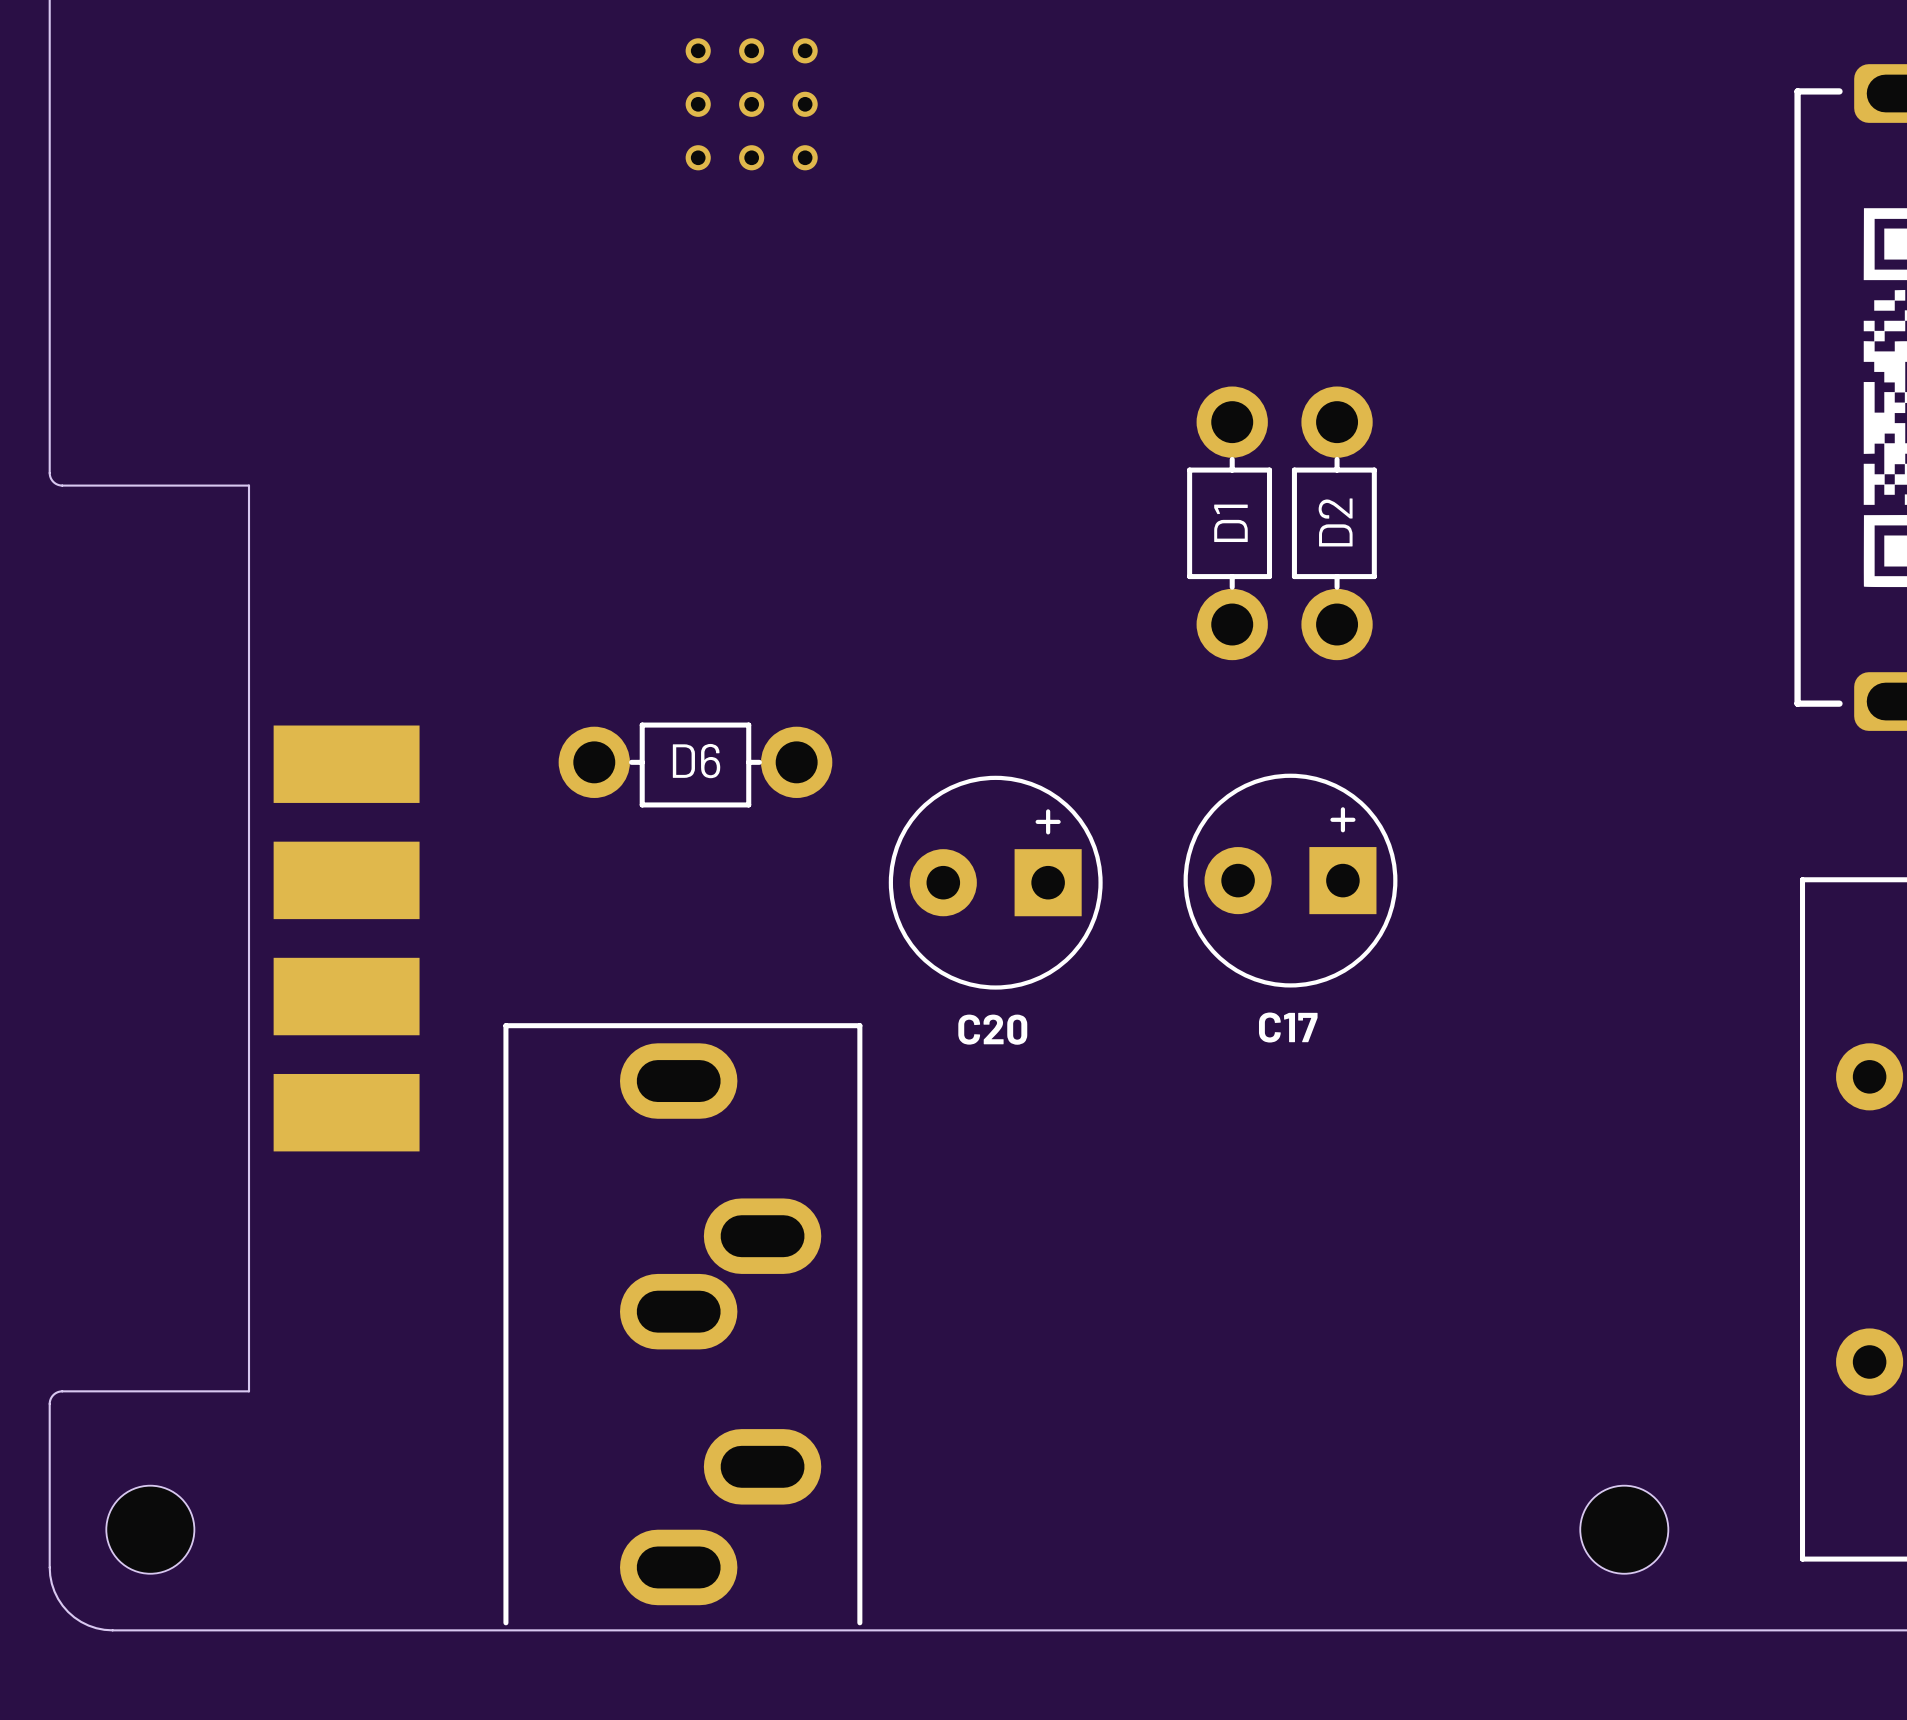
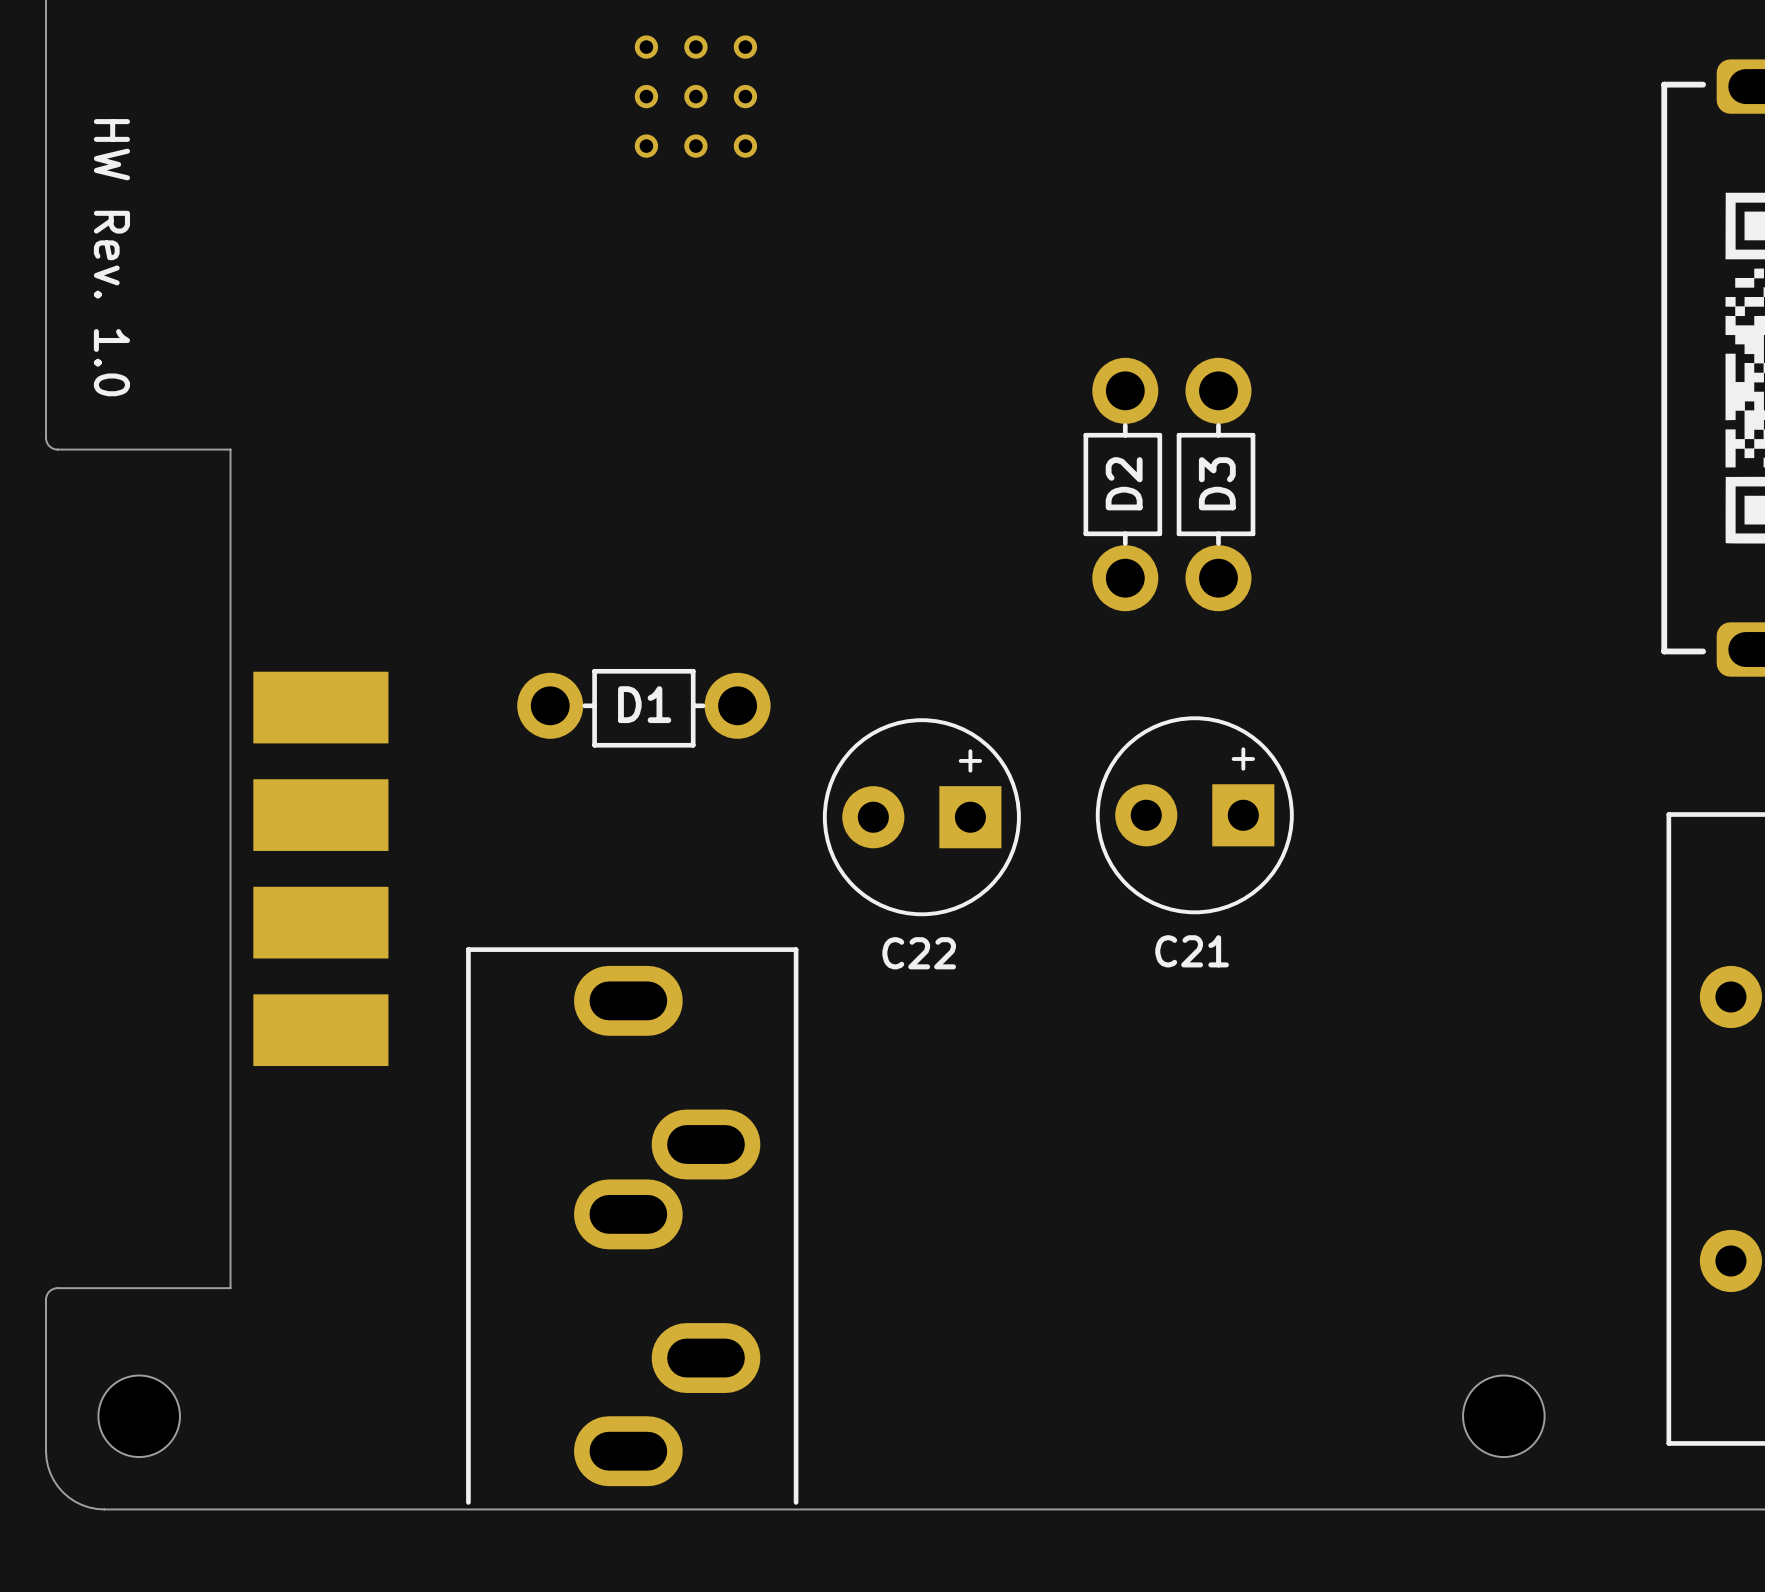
text: none -> HW Rev. 1.0 (111, 257)
D1: (1229, 523) -> none
D3: none -> (1216, 484)
D2 position: (1334, 523) -> (1122, 484)
D6 name: D6 (696, 761) -> D1 (644, 704)
C17 name: C17 (1288, 1027) -> C21 (1192, 951)
C20 name: C20 (992, 1029) -> C22 (919, 953)

